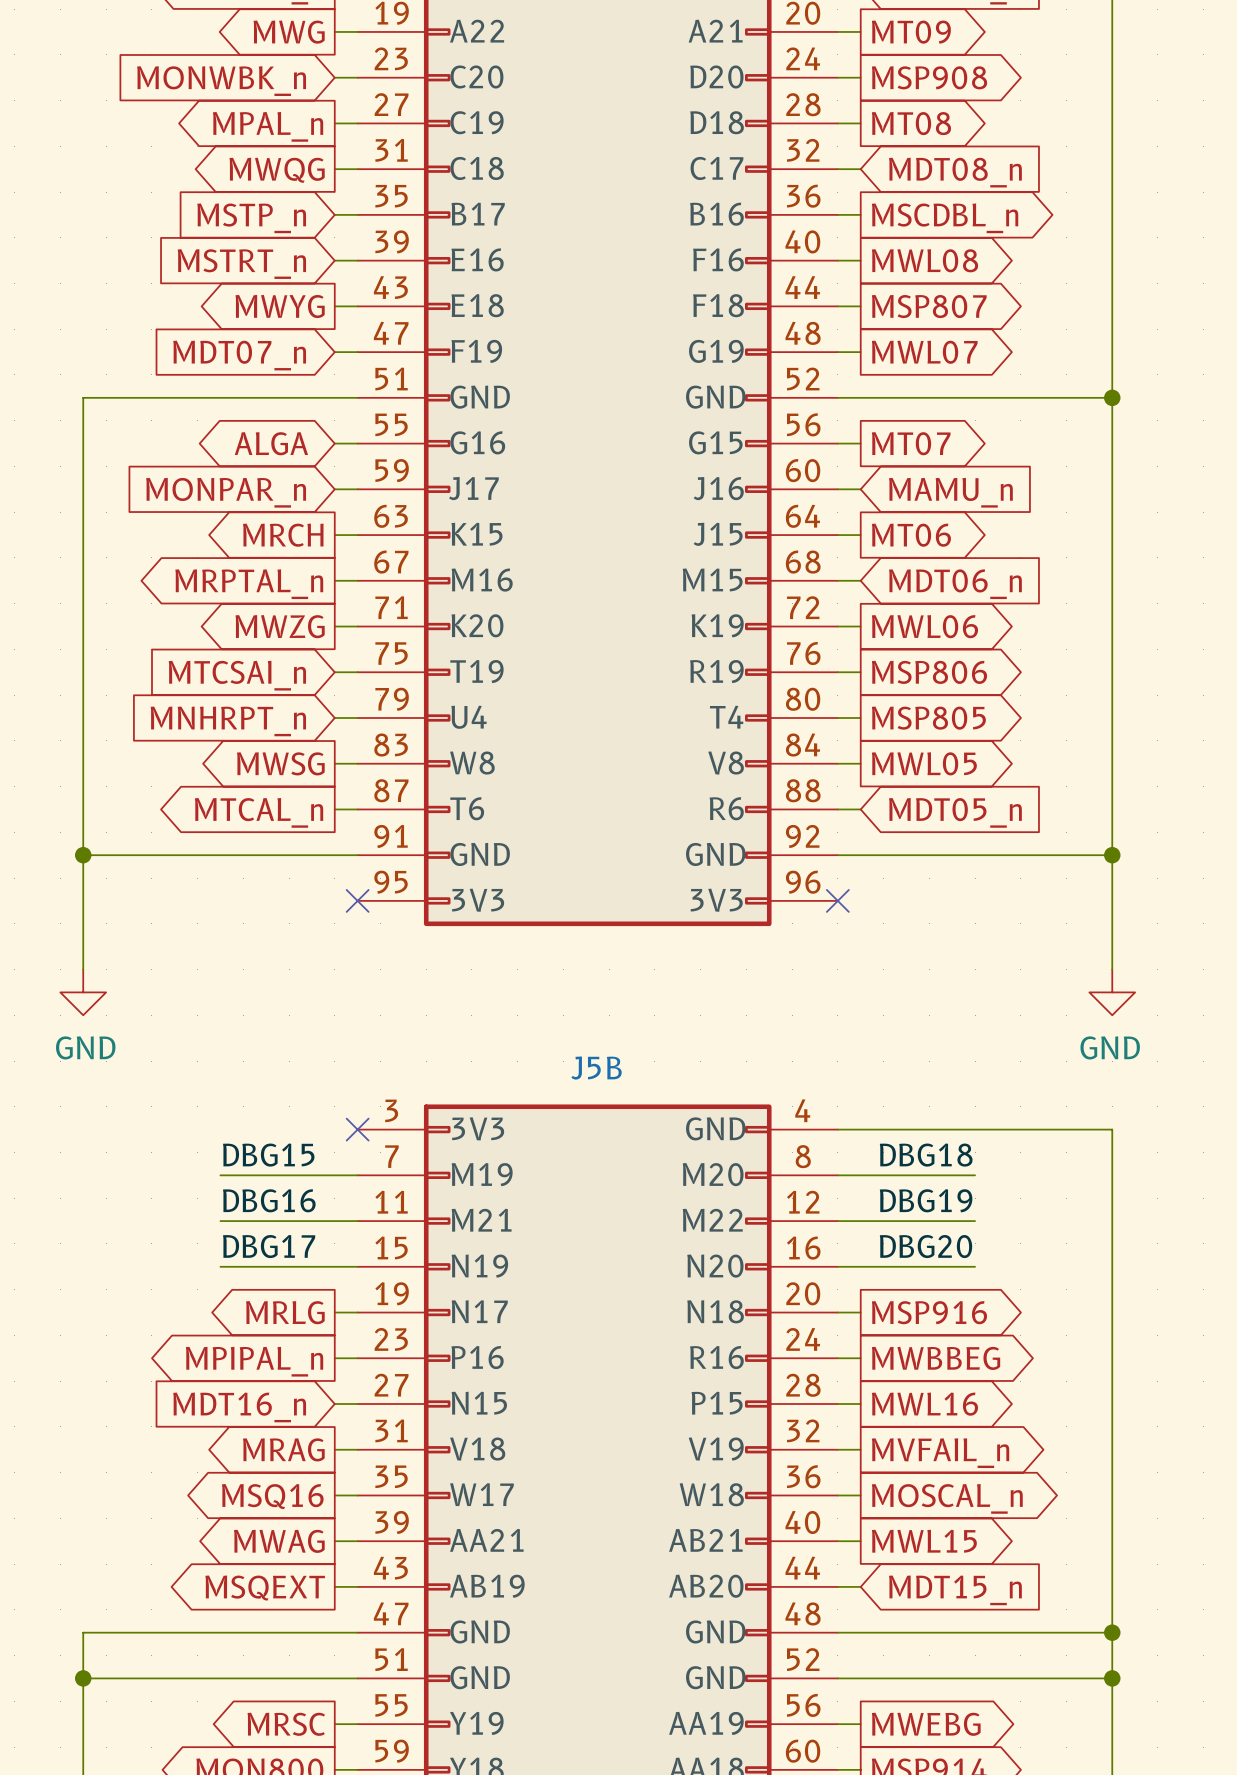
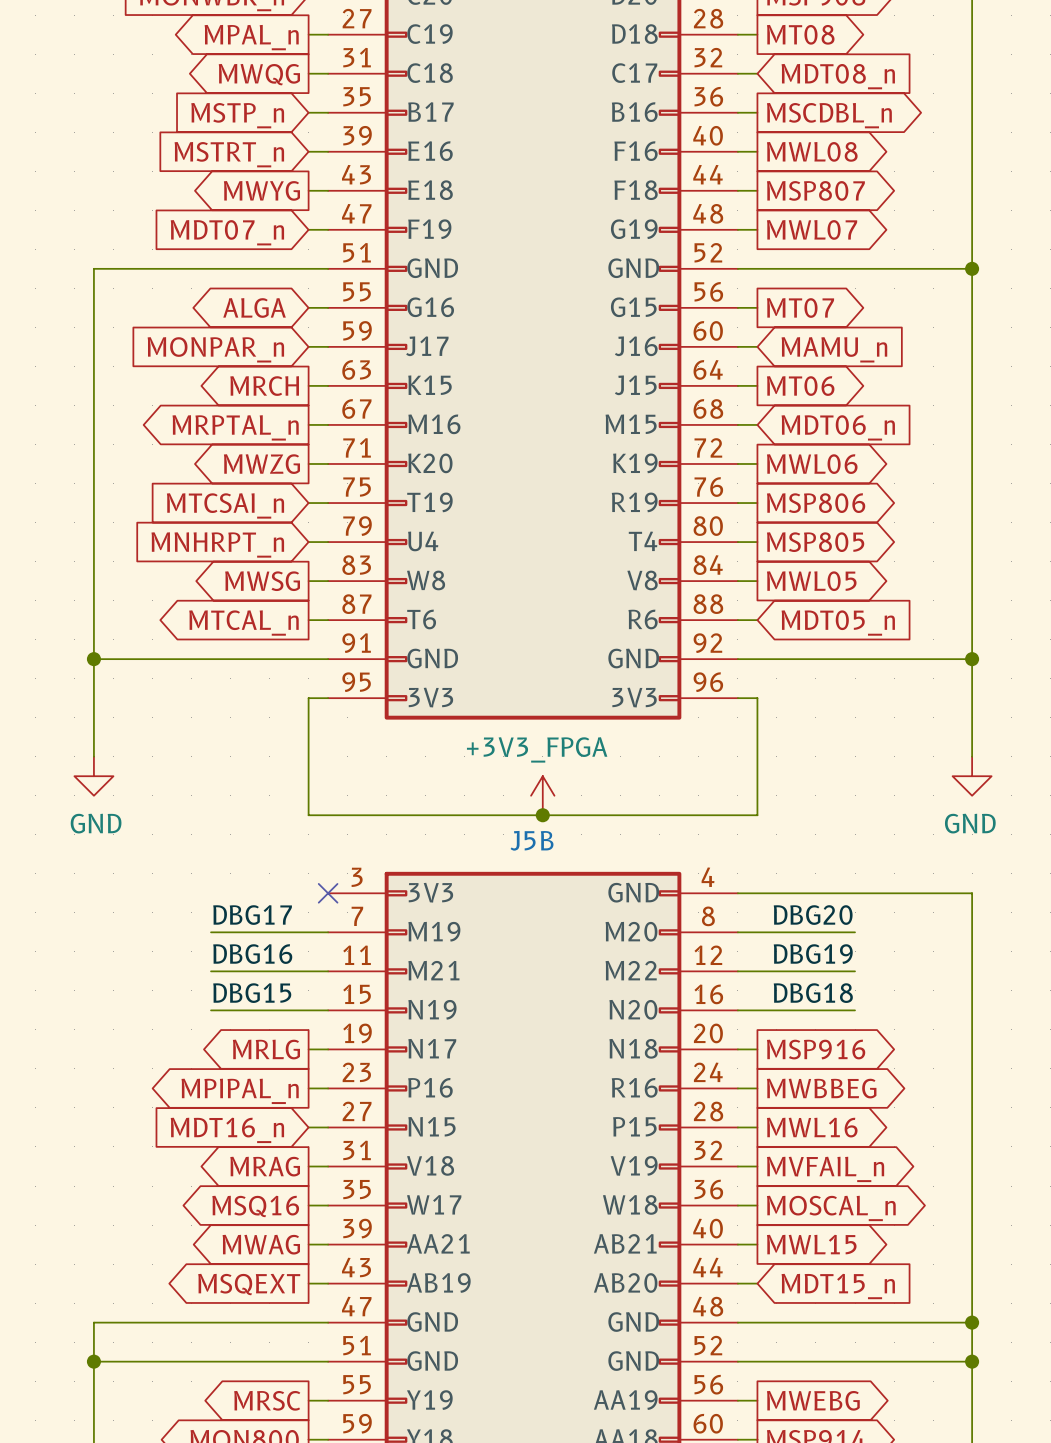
wire: none -> (328, 698) (308, 698) (308, 815) (757, 815) (757, 698) (737, 698)
no-connect mark: (357, 900) -> none
no-connect mark: (837, 900) -> none
power symbol: none -> +3V3_FPGA (542, 795)
junction: none -> (542, 815)
label: DBG15 (268, 1155) -> DBG17 (252, 915)
label: DBG18 (926, 1155) -> DBG20 (813, 915)
label: DBG17 (269, 1246) -> DBG15 (252, 993)
label: DBG20 (926, 1246) -> DBG18 (813, 993)

